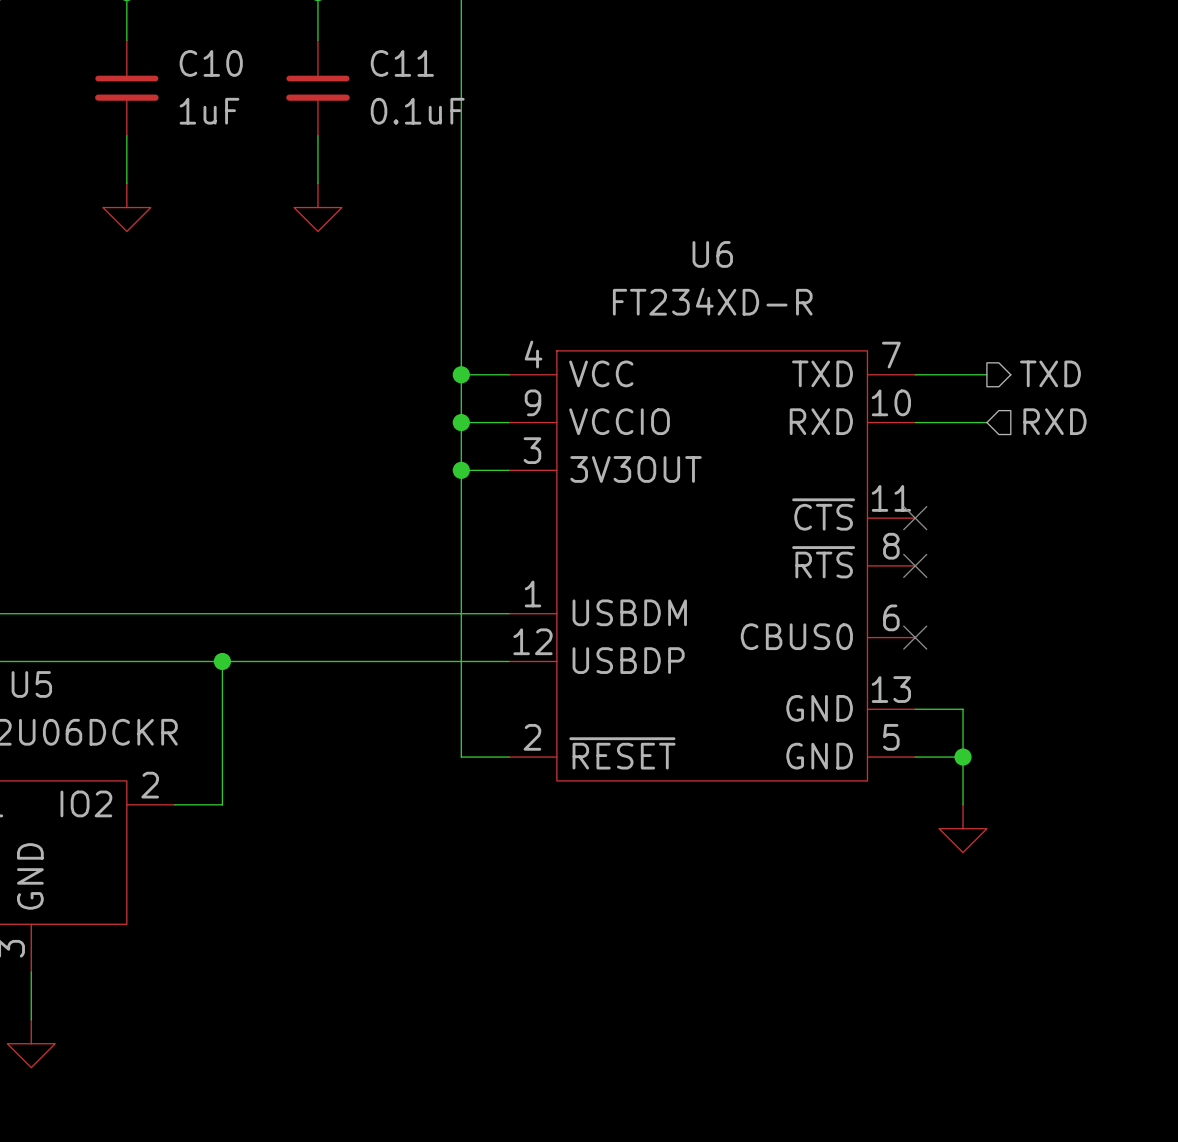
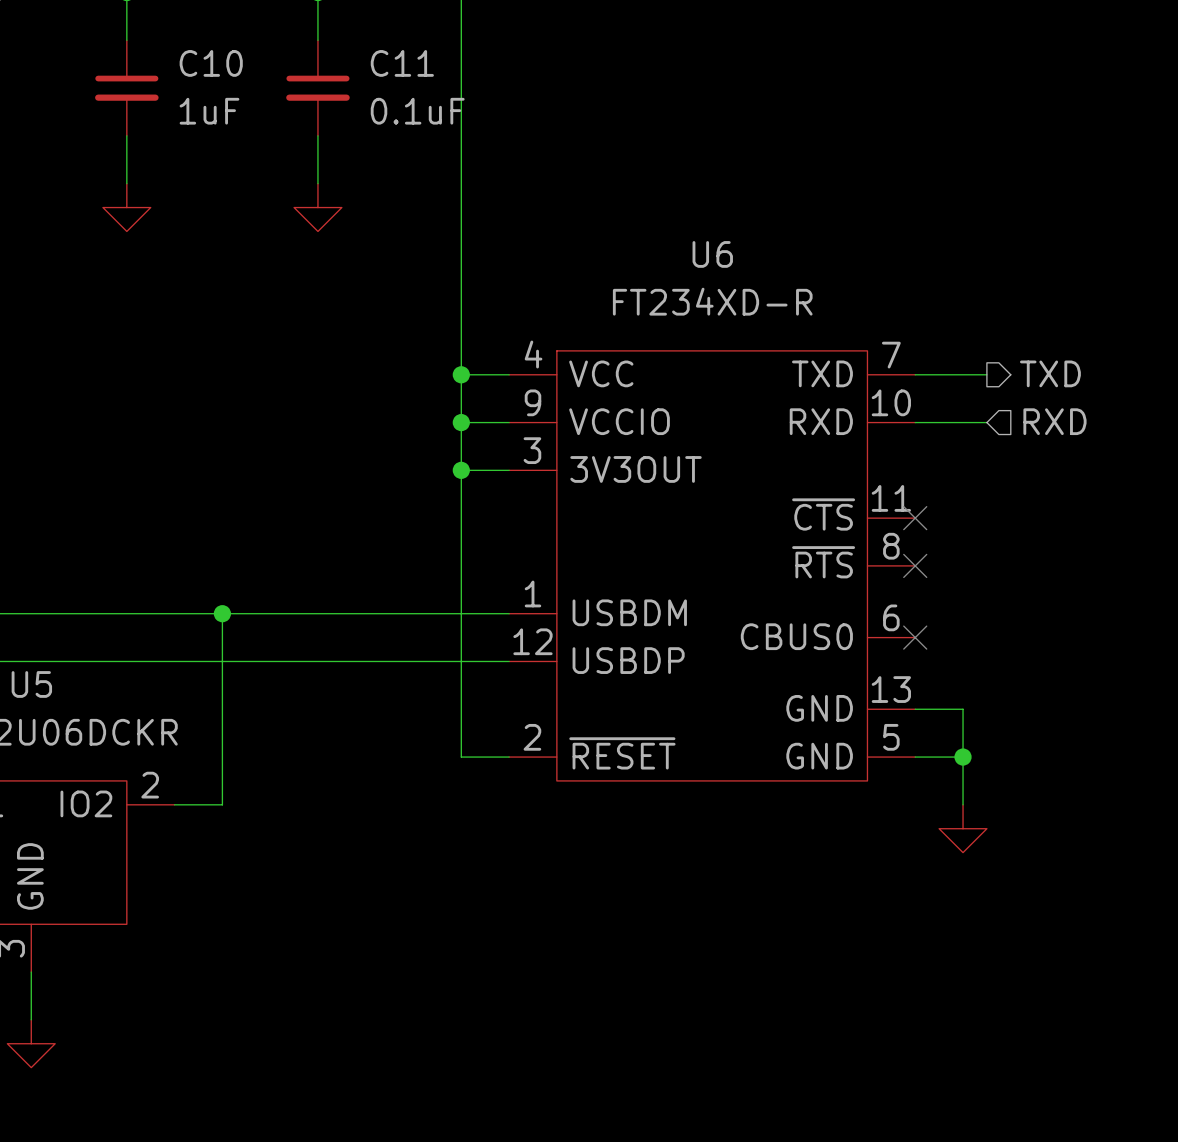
wire: none -> (222, 613) (222, 661)
junction position: (222, 661) -> (222, 613)

